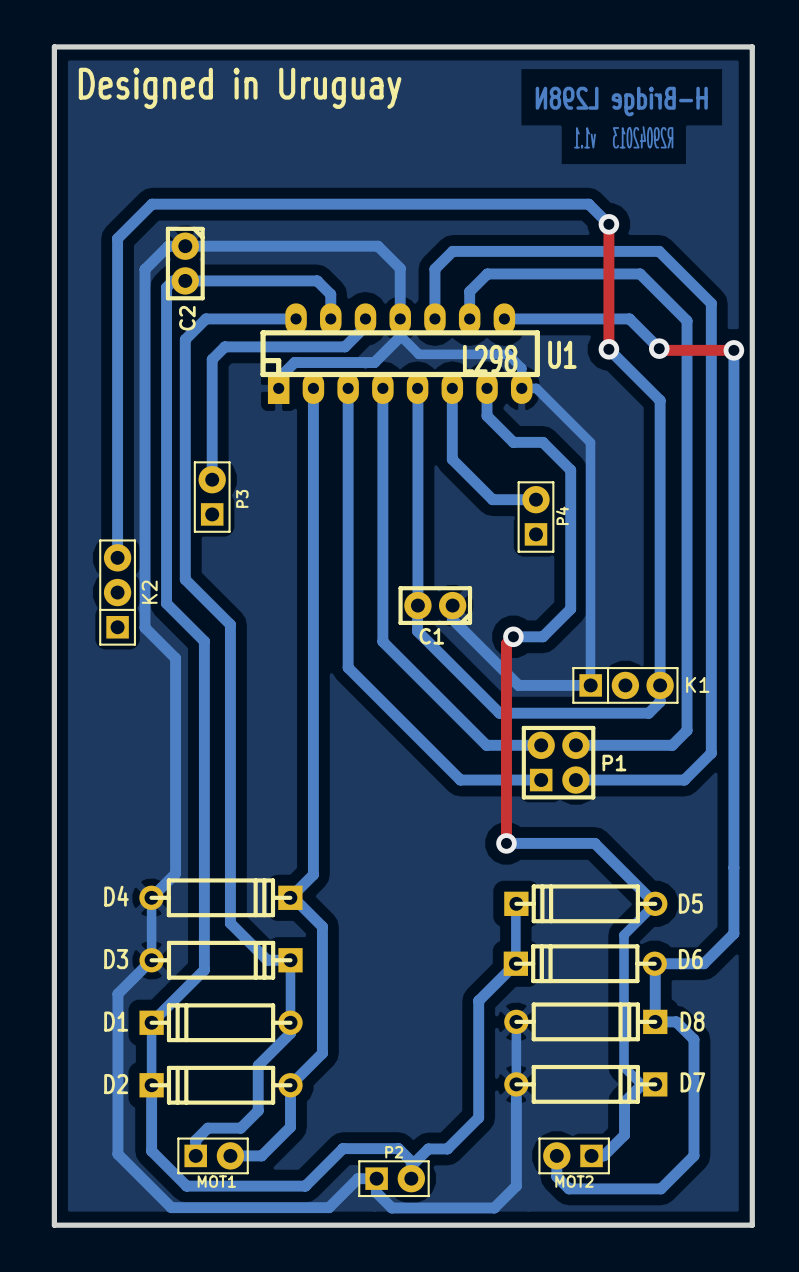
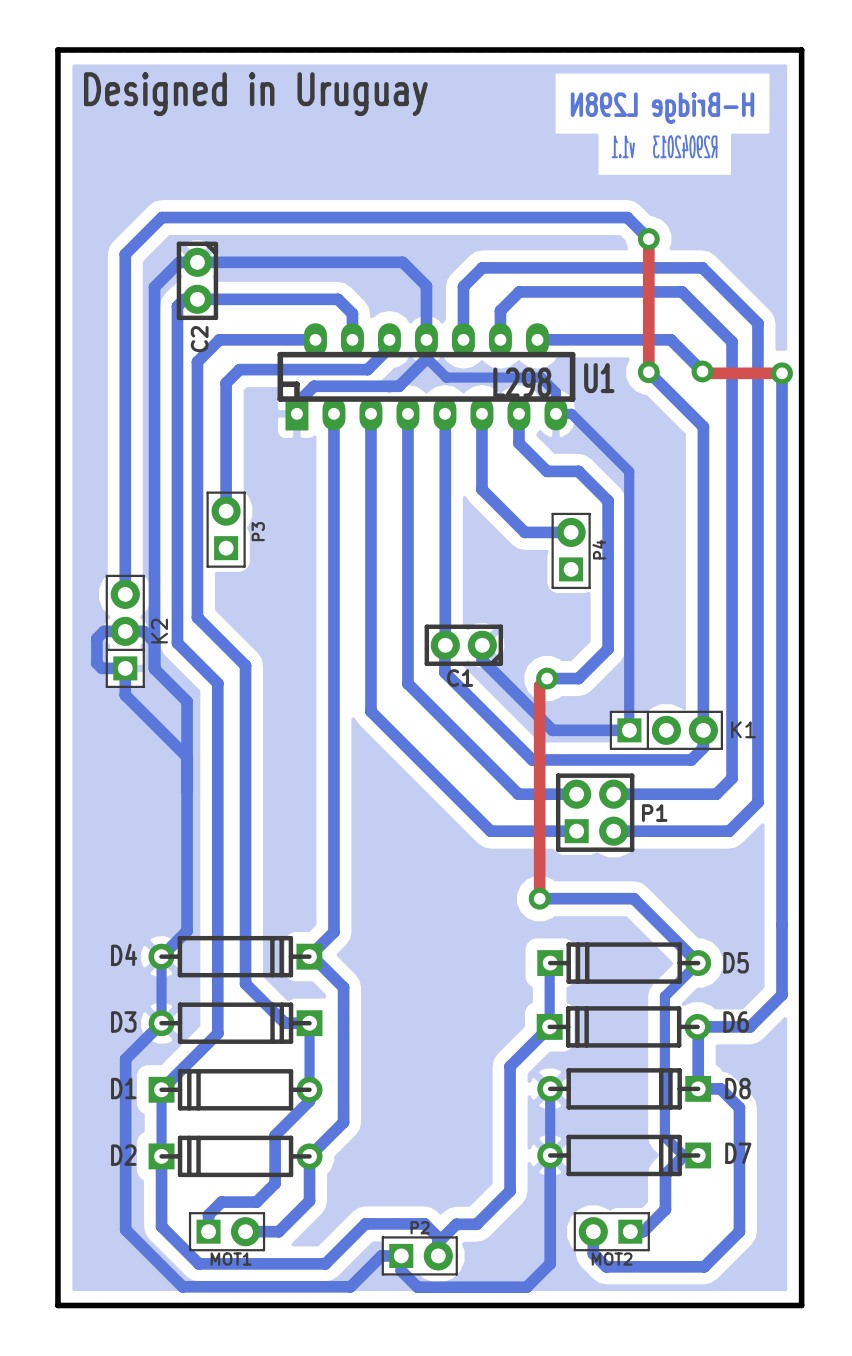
bottom track: none -> (154, 642) (143, 631) (104, 631) (96, 638) (96, 663) (101, 668) (125, 668) (125, 695) (187, 757) (187, 790)

